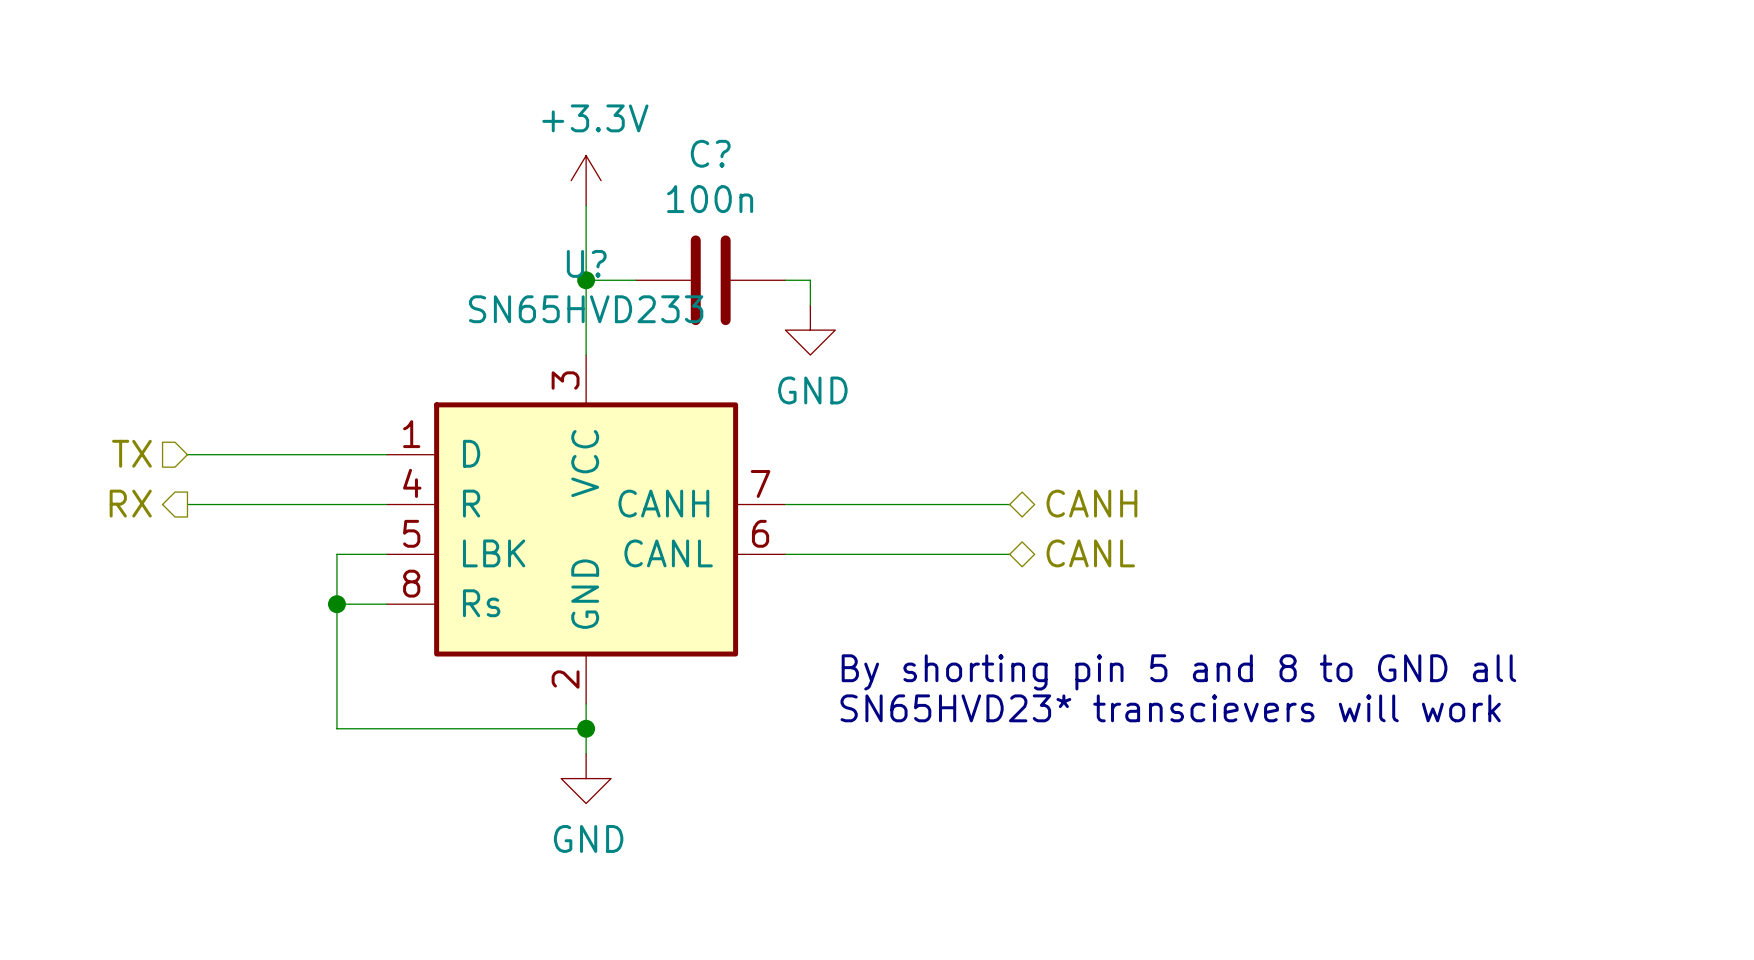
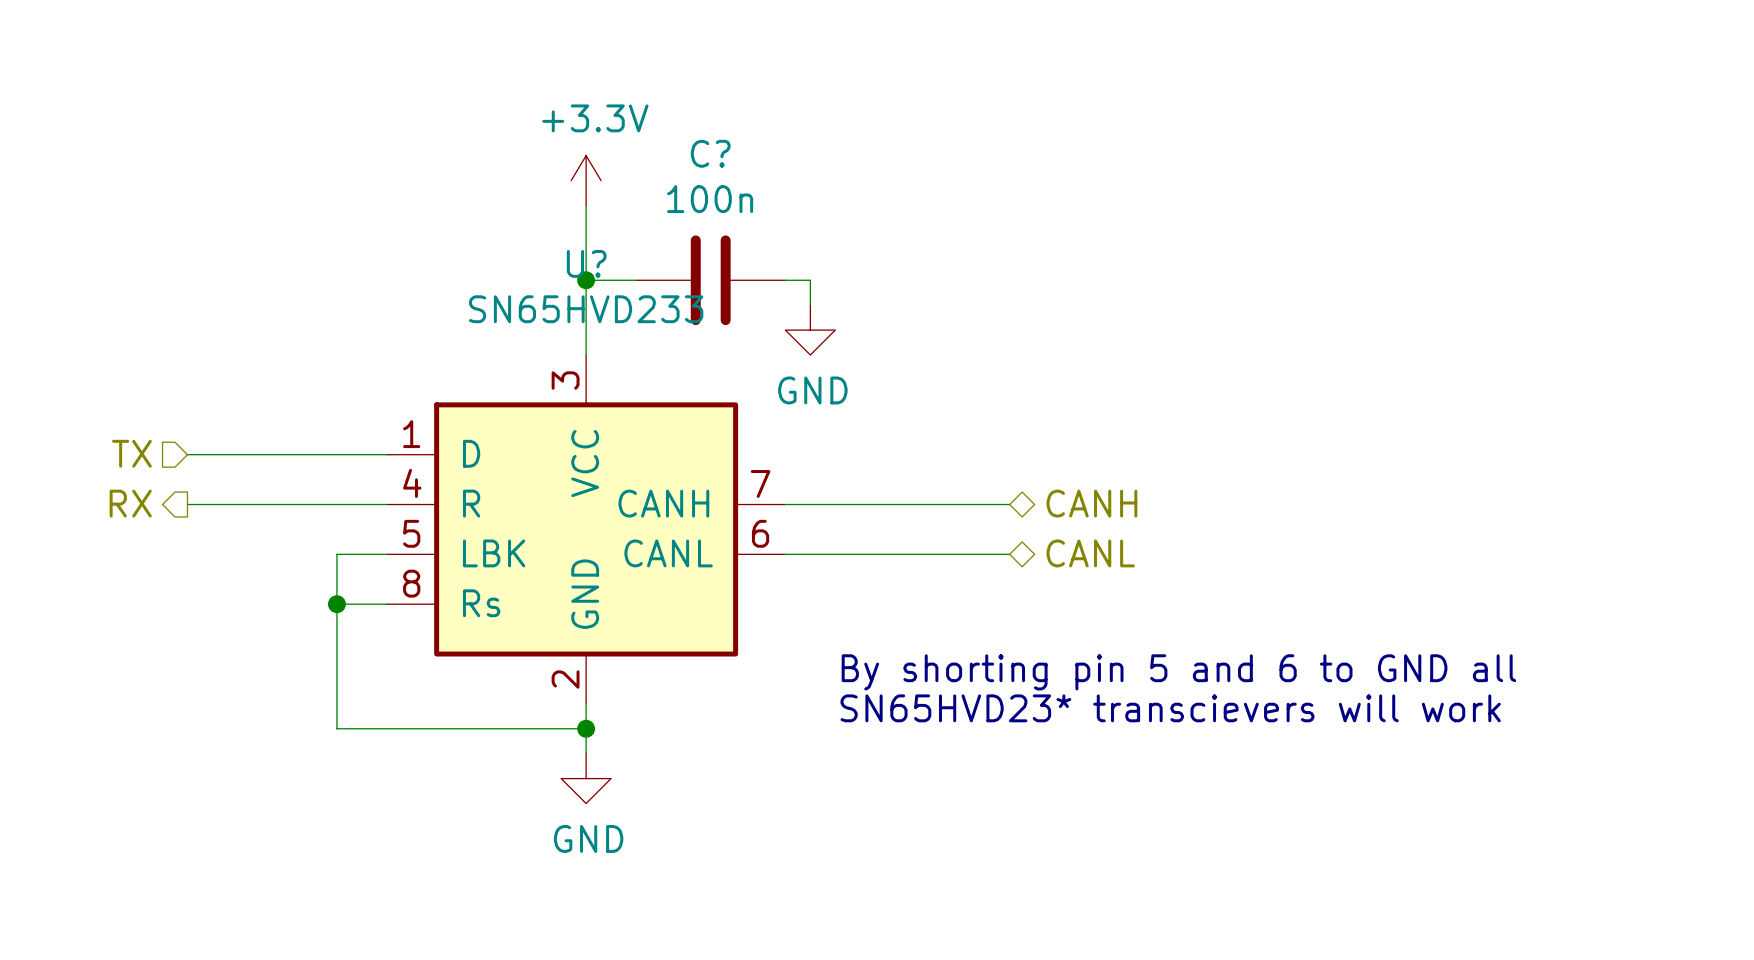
text: By shorting pin 5 and 8 to GND all (1178, 672) -> By shorting pin 5 and 6 to GND all (1178, 672)

